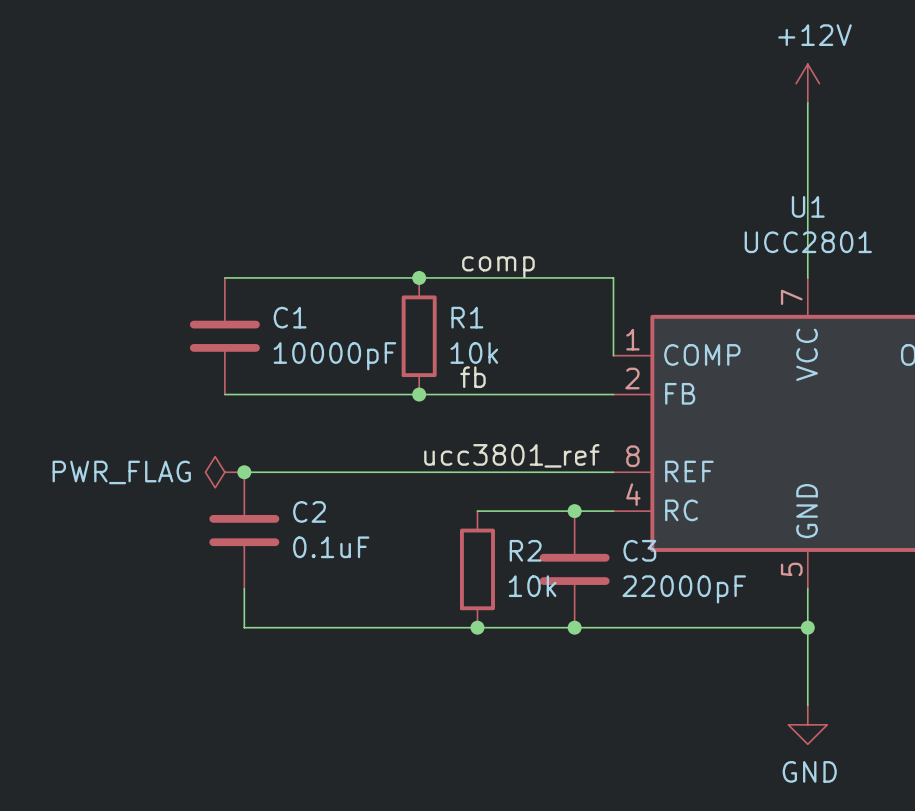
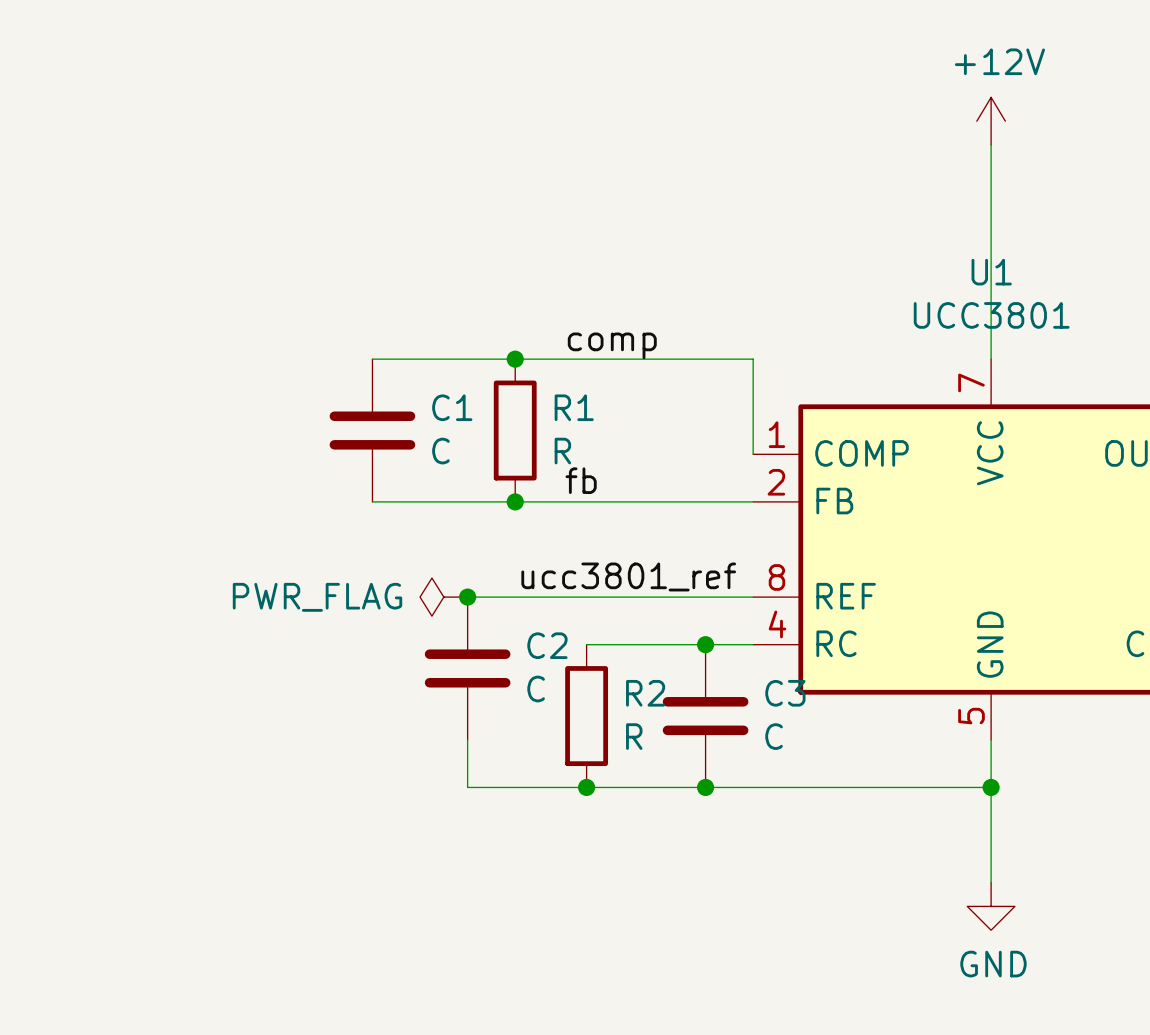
U1 value: UCC2801 (808, 242) -> UCC3801 (991, 315)
wire: (224, 277) (302, 277) -> none
C1 position: (224, 336) -> (372, 430)
R1 value: 10k (474, 353) -> R (562, 451)
C1 value: 10000pF (334, 356) -> C (440, 451)
wire: (224, 394) (302, 394) -> none
power symbol position: PWR_FLAG (224, 472) -> PWR_FLAG (443, 597)
wire: (244, 472) (380, 472) -> none
junction: (244, 472) -> none
junction: none -> (467, 597)
C2 position: (244, 530) -> (467, 668)
C2 value: 0.1uF (331, 547) -> C (536, 689)
R2 value: 10k (532, 586) -> R (634, 736)
wire: (244, 588) (244, 627) (380, 627) -> (467, 739) (467, 787)
C3 value: 22000pF (684, 589) -> C (774, 736)

